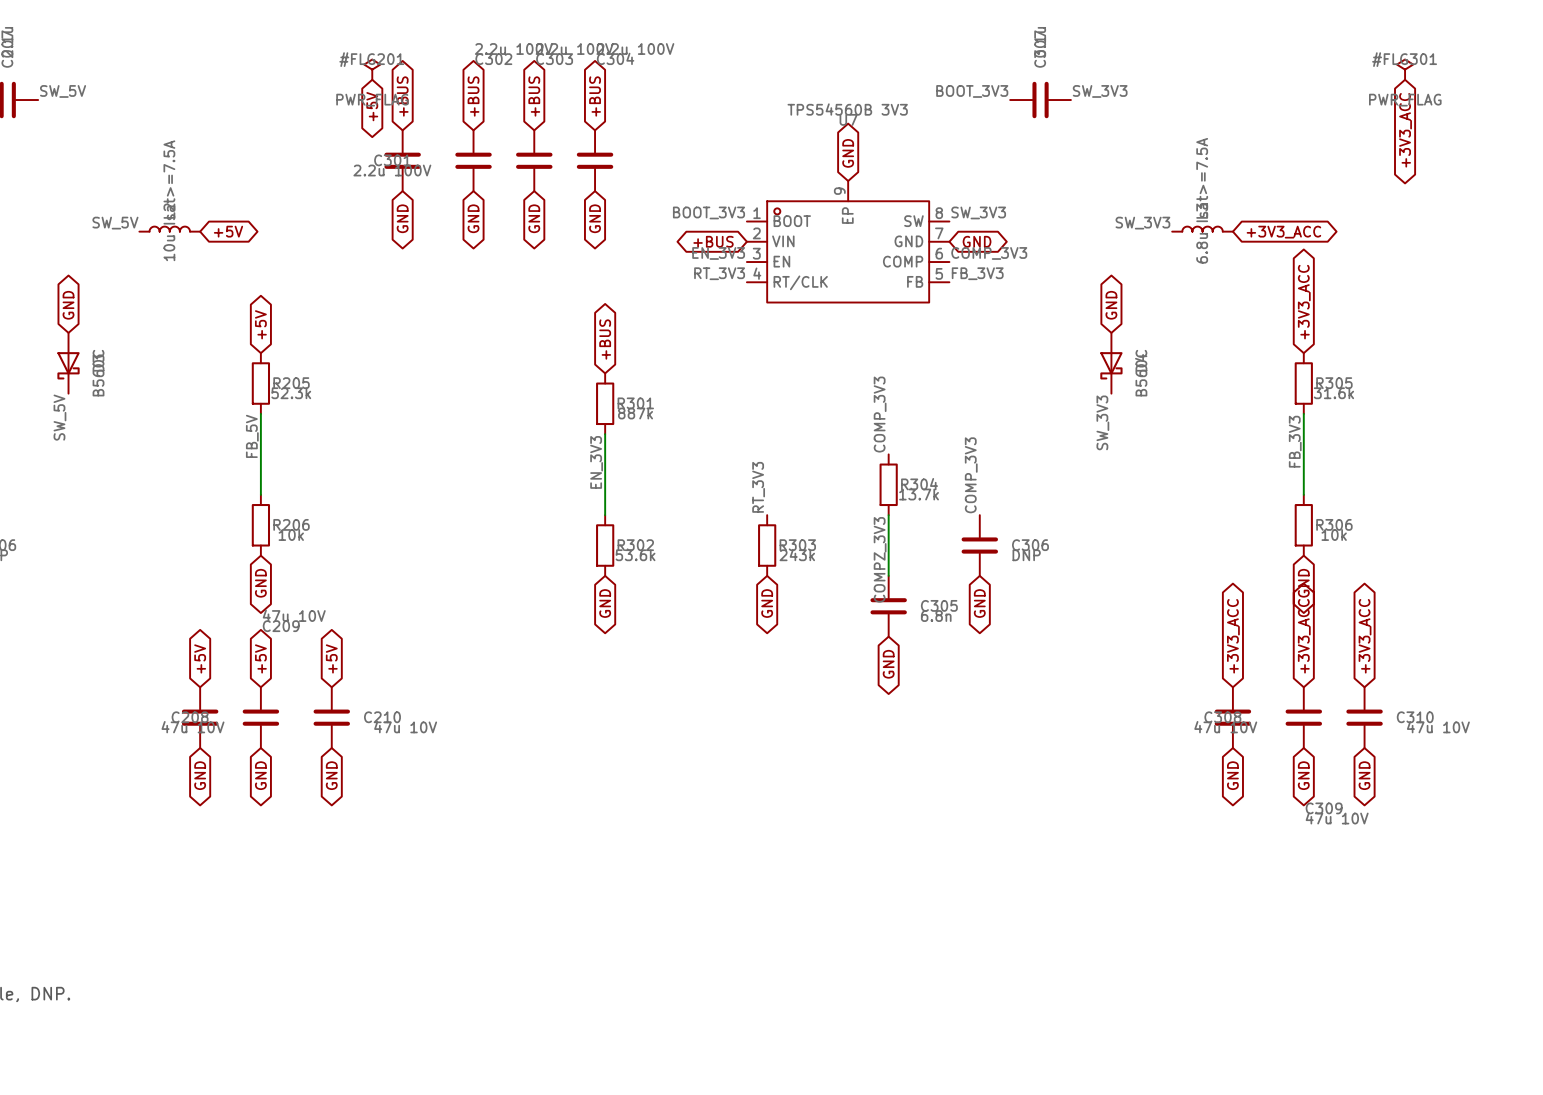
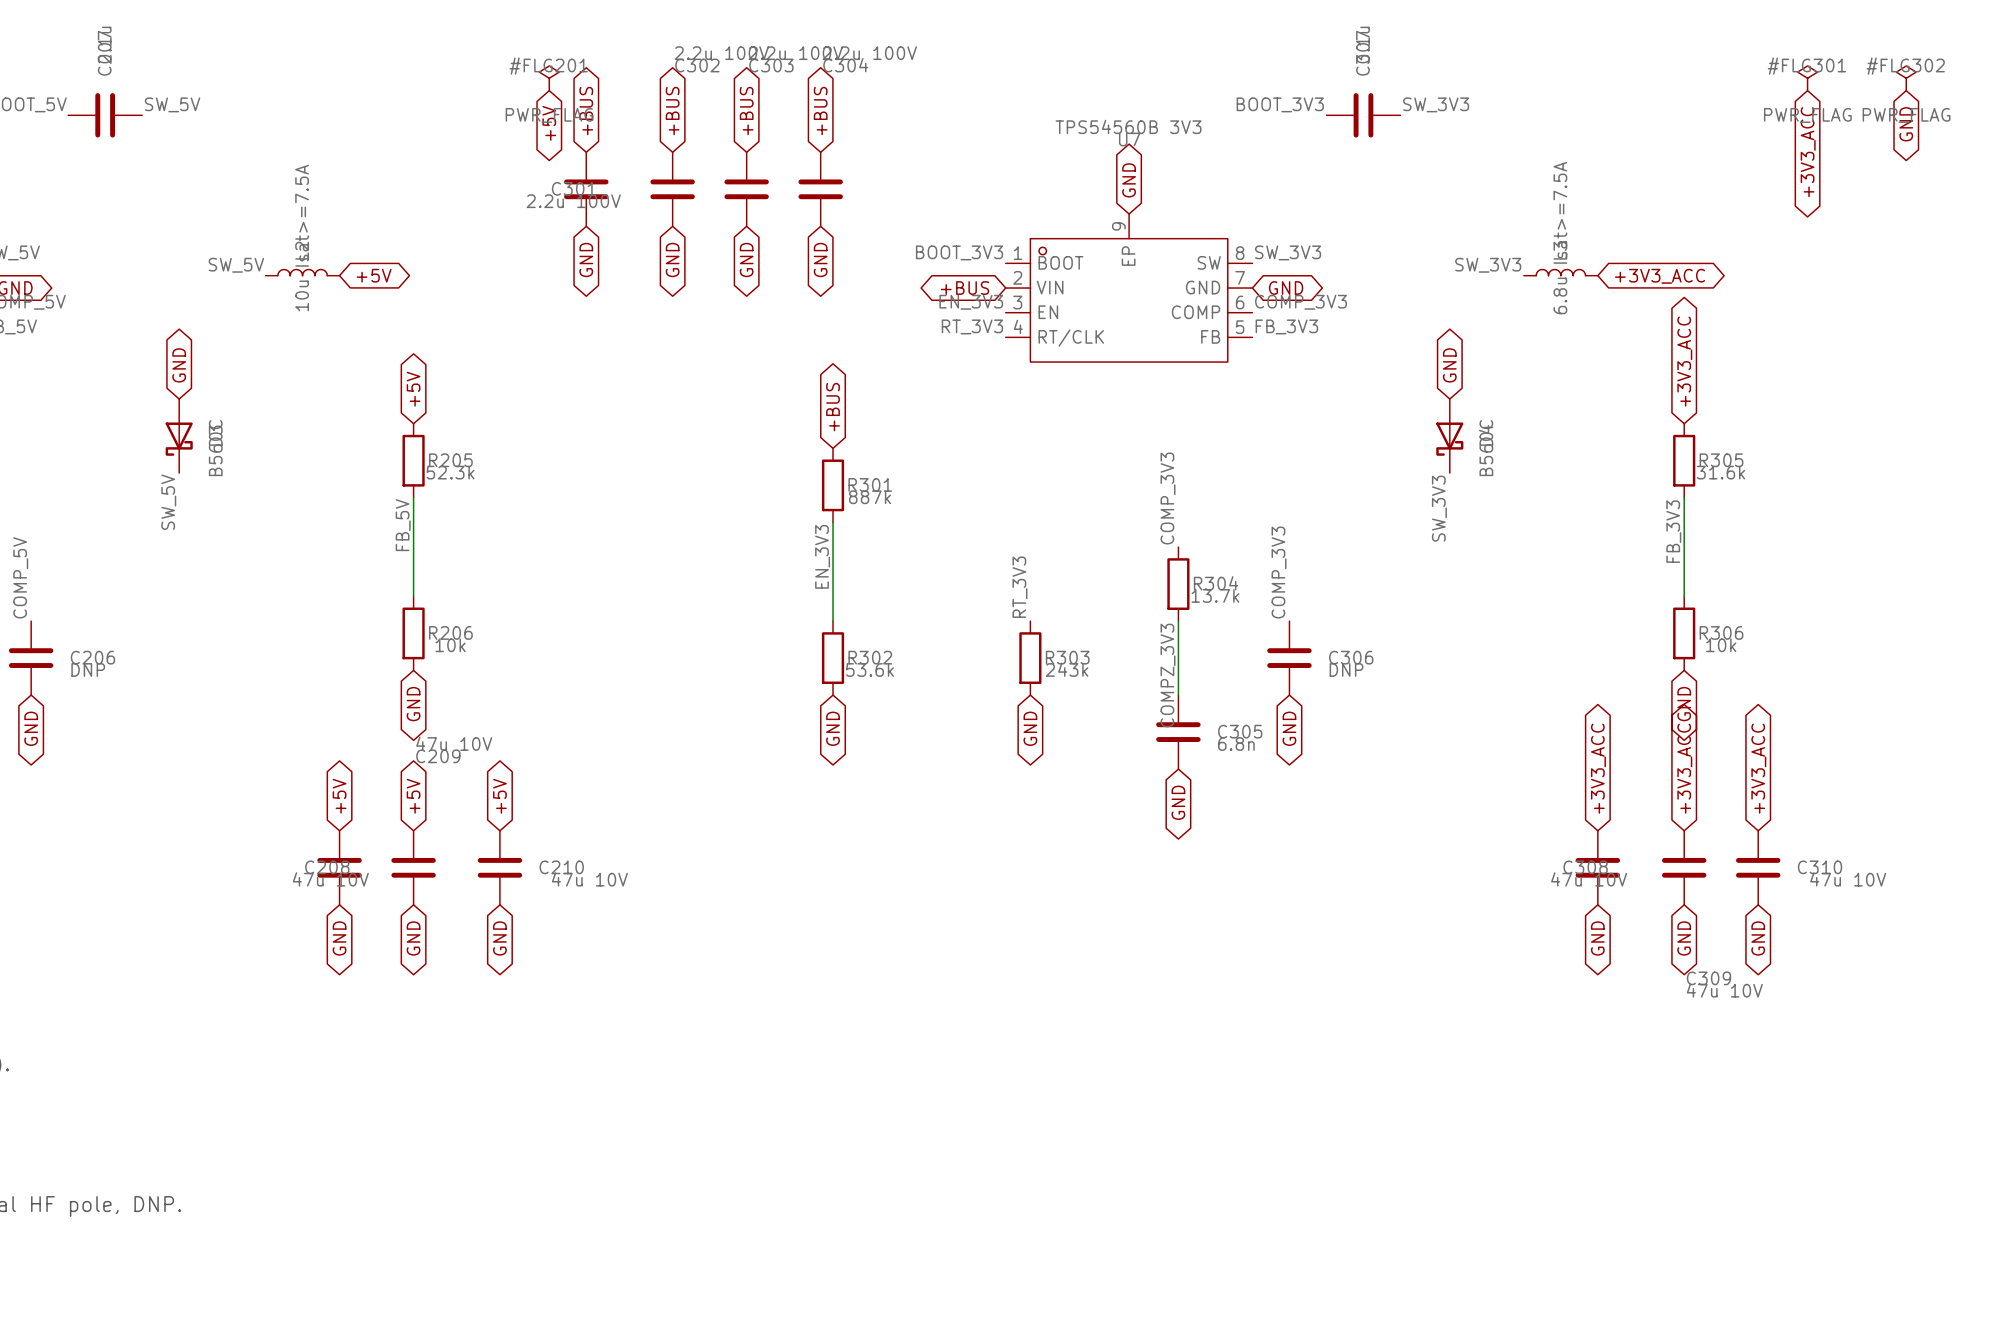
#FLG302: none -> PWR_FLAG (1906, 78)
global label: none -> GND (1906, 124)

